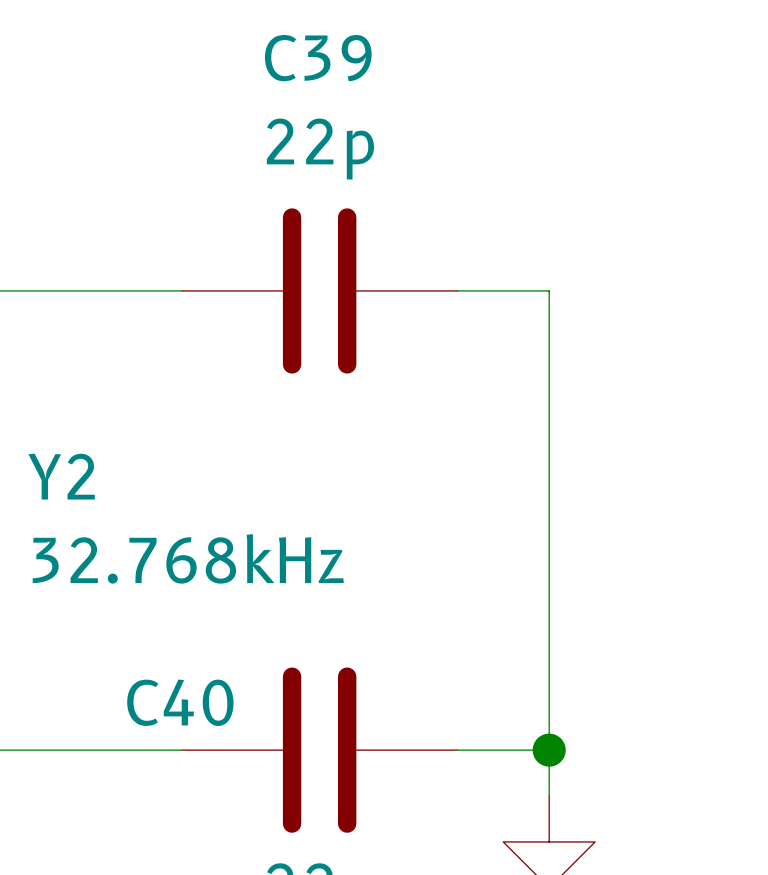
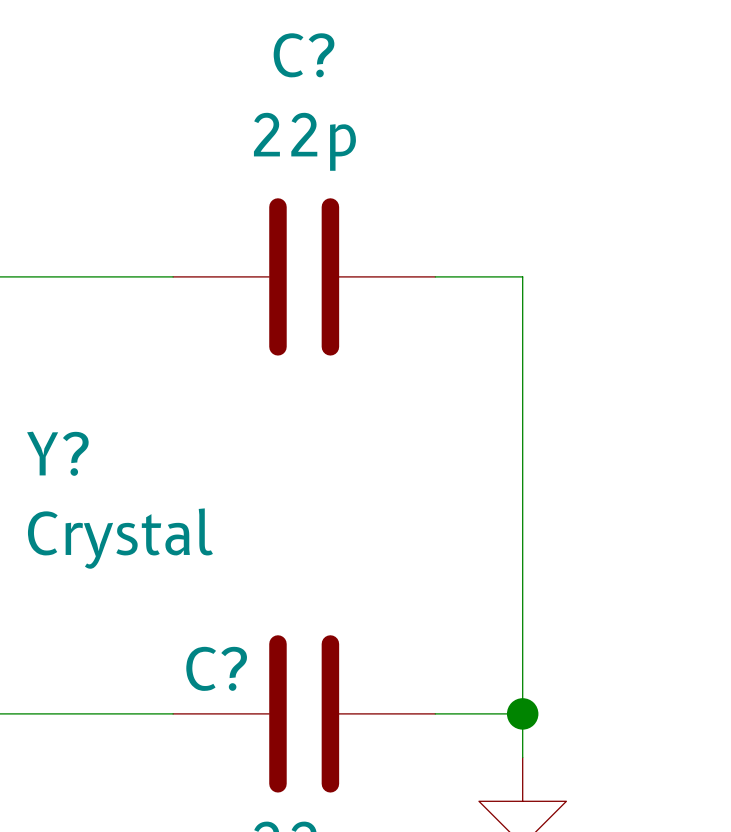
C39 name: C39 (318, 58) -> C? (304, 55)
Y2 name: Y2 (61, 476) -> Y? (57, 453)
Y2 value: 32.768kHz (188, 558) -> Crystal (120, 538)
C40 name: C40 (180, 702) -> C? (216, 668)

